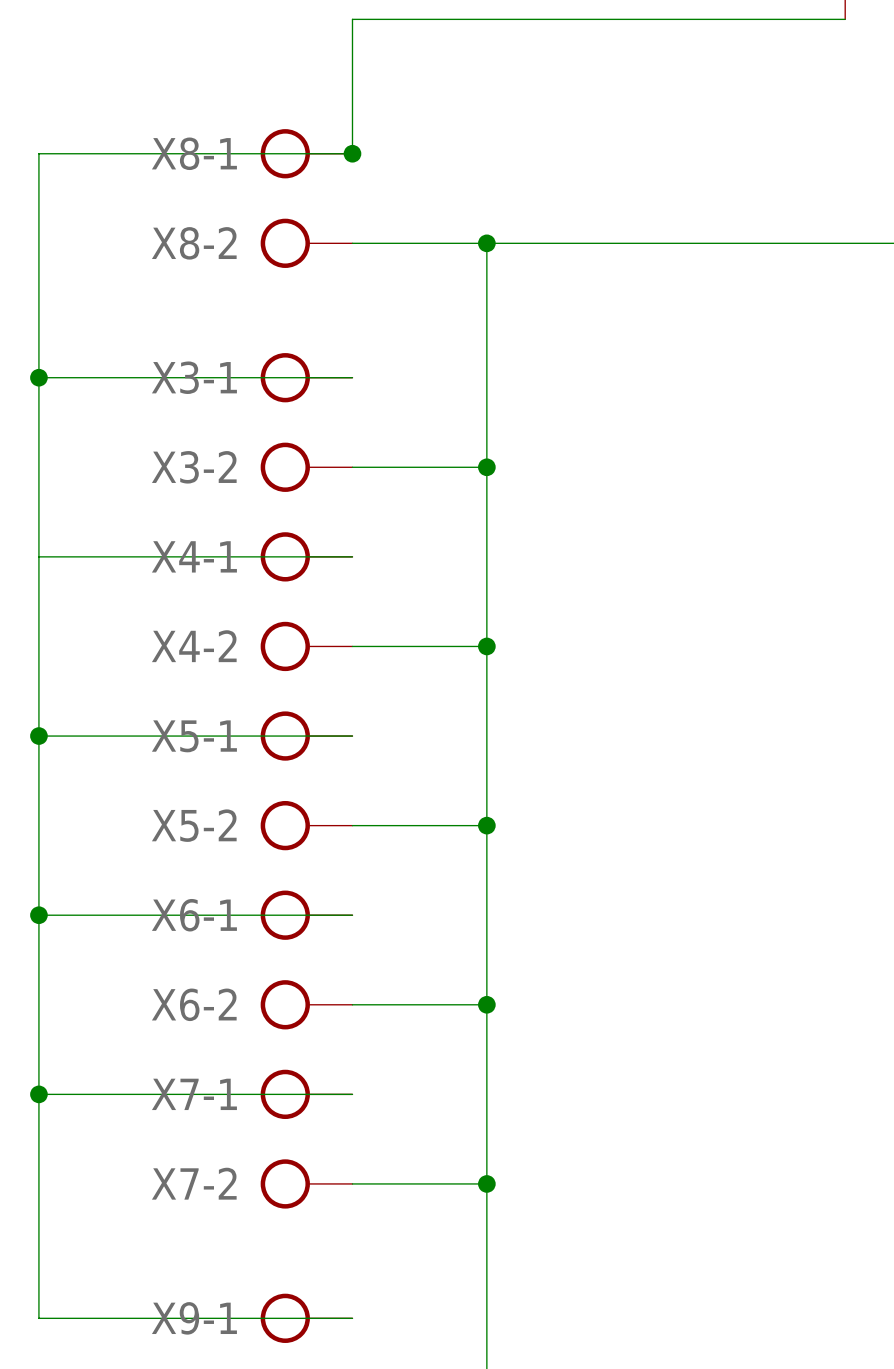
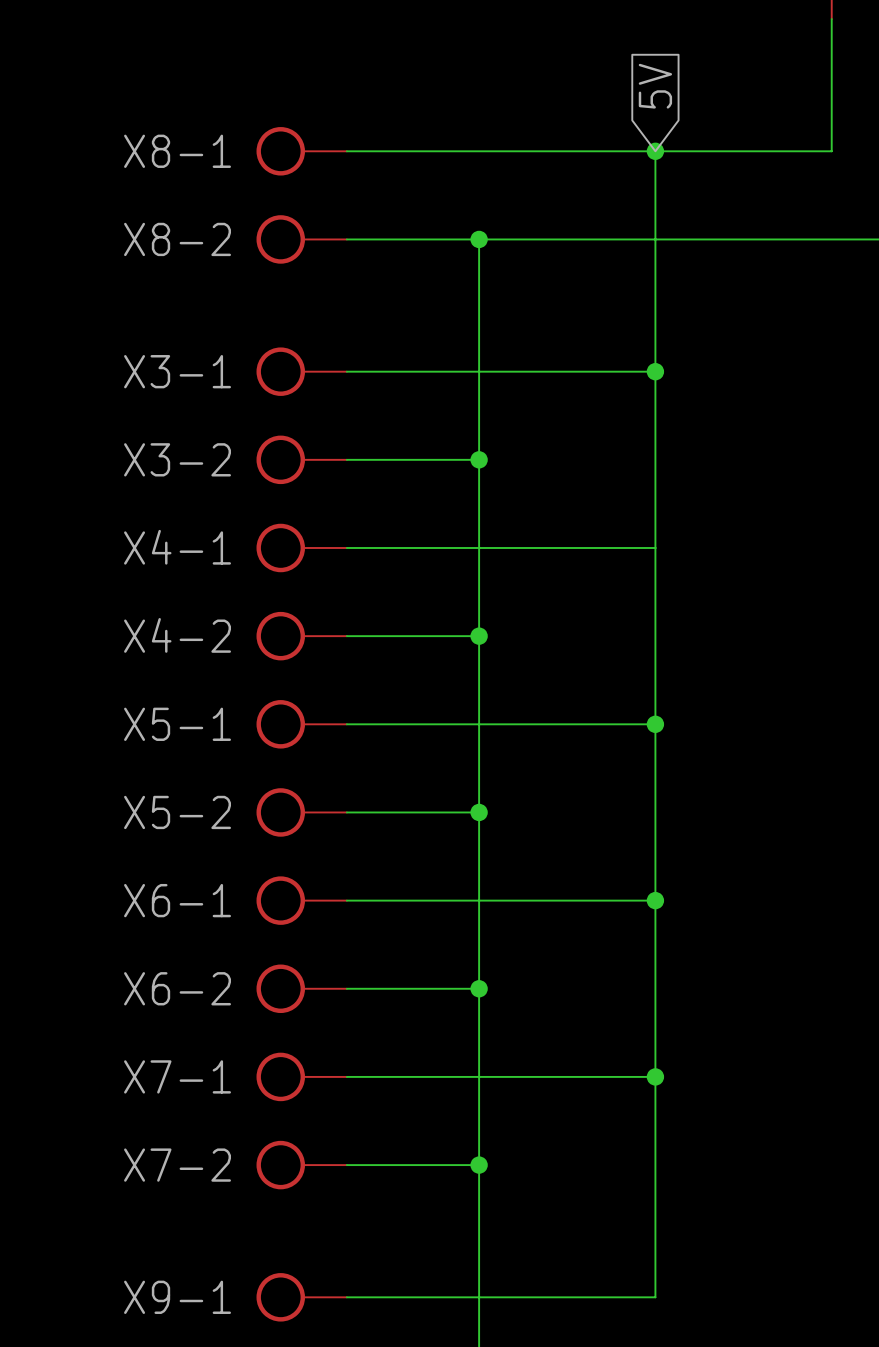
wire: (845, 19) (352, 19) (352, 153) (38, 153) (38, 1318) (352, 1318) -> (655, 151) (655, 1297) (346, 1297)
wire: none -> (831, 19) (831, 151) (346, 151)
global label: none -> 5V (655, 86)
junction: (352, 153) -> none
junction: none -> (655, 151)
wire: (38, 377) (352, 377) -> (655, 371) (346, 371)
junction: (38, 377) -> none
junction: none -> (655, 371)
wire: (38, 556) (352, 556) -> (655, 547) (346, 547)
wire: (38, 736) (352, 736) -> (655, 724) (346, 724)
junction: (38, 736) -> none
junction: none -> (655, 724)
wire: (38, 915) (352, 915) -> (655, 900) (346, 900)
junction: (38, 915) -> none
junction: none -> (655, 900)
wire: (38, 1094) (352, 1094) -> (655, 1076) (346, 1076)
junction: (38, 1094) -> none
junction: none -> (655, 1076)

